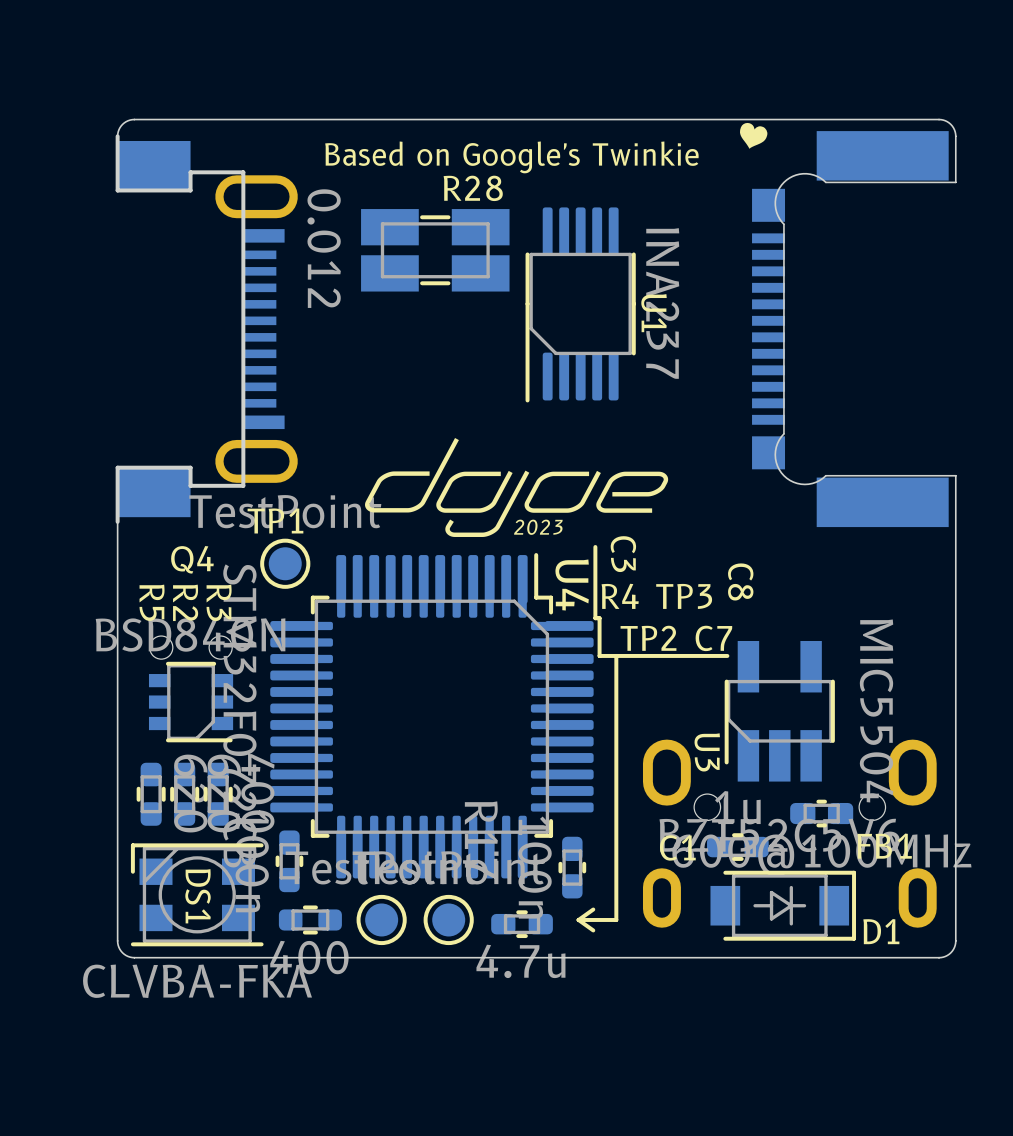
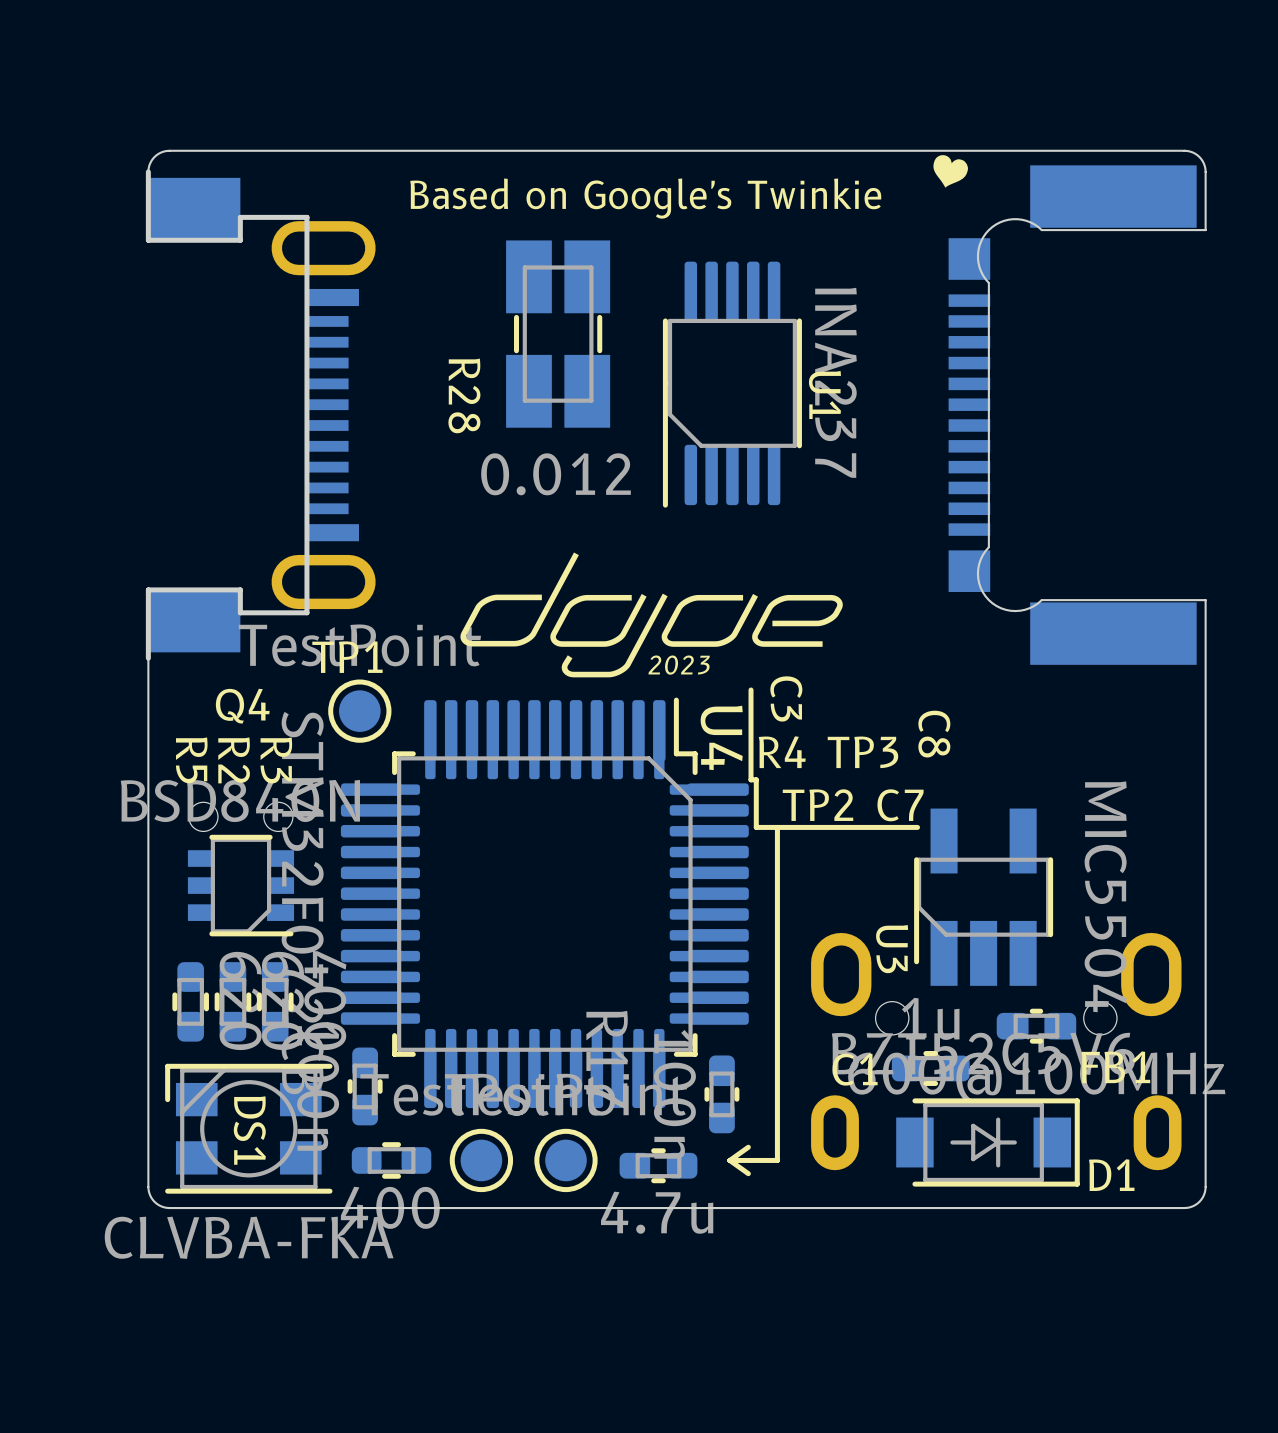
R28 name position: R28 (473, 188) -> R28 (464, 395)
R28 value position: 0.012 (324, 248) -> 0.012 (556, 474)
R28 rotation: 0° (435, 250) -> 90° clockwise (558, 334)

